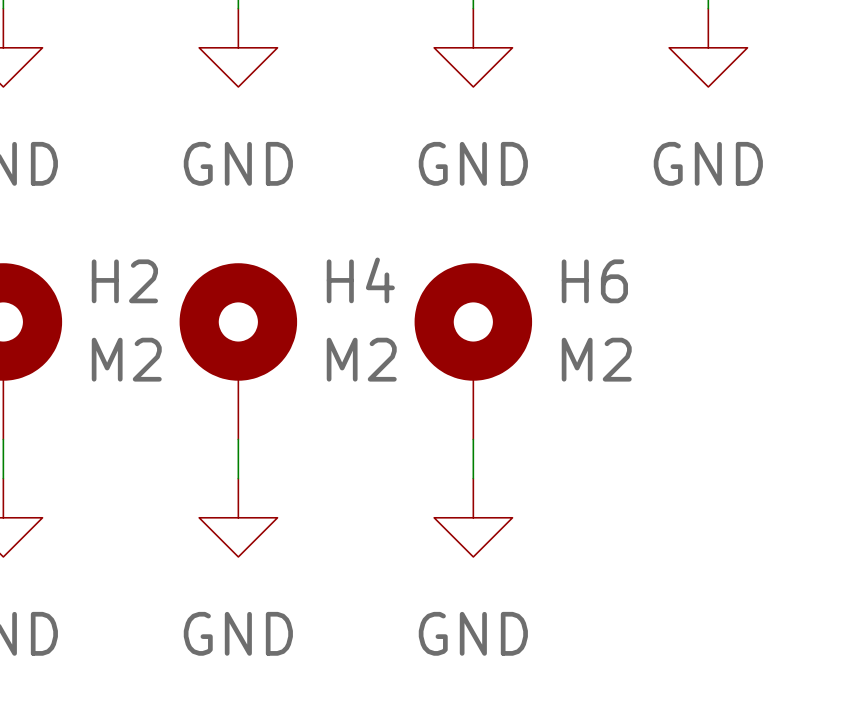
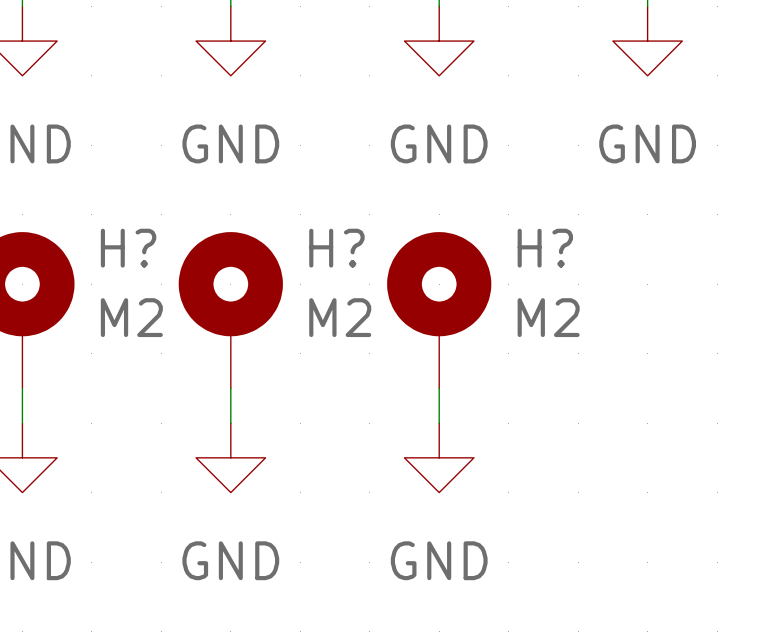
H4 name: H4 (360, 280) -> H? (336, 248)
H2 name: H2 (124, 281) -> H? (128, 248)
H6 name: H6 (594, 281) -> H? (545, 248)

